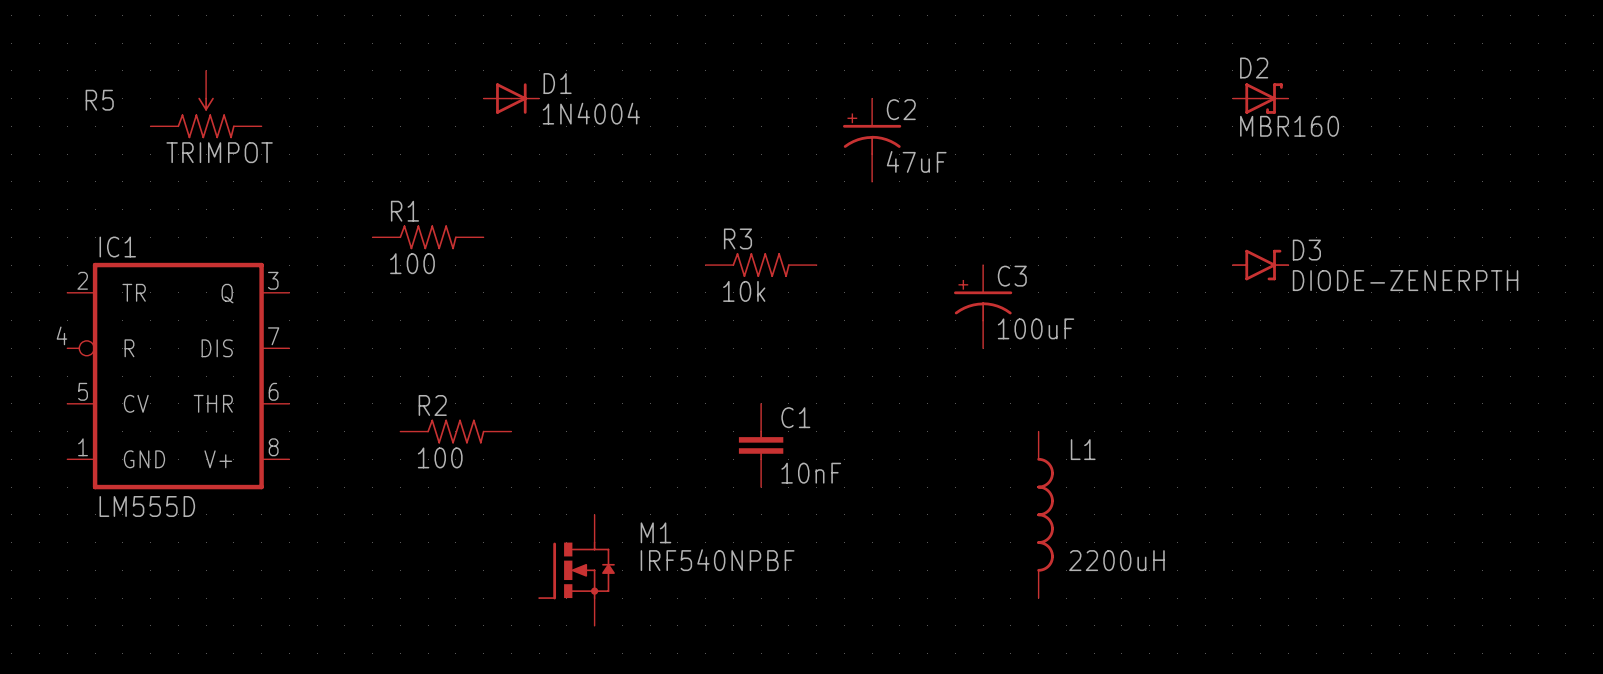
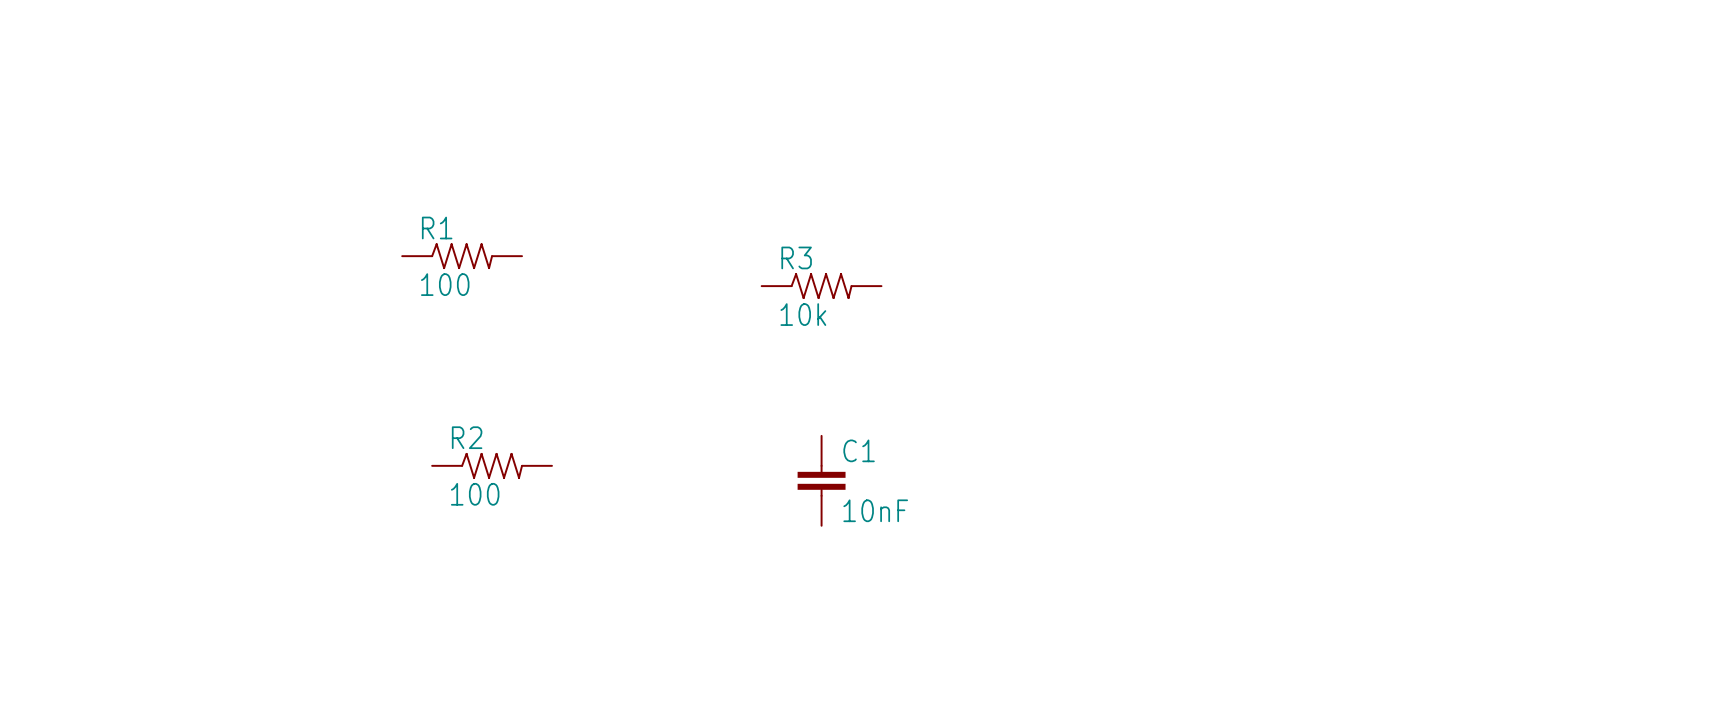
D1: 1N4004 (511, 98) -> none
D2: MBR160 (1260, 98) -> none
R5: TRIMPOT (206, 104) -> none
C2: 47uF (872, 140) -> none
D3: DIODE-ZENERPTH (1260, 265) -> none
C3: 100uF (983, 306) -> none
IC1: LM555D (178, 376) -> none
L1: 2200uH (1045, 514) -> none
M1: IRF540NPBF (576, 570) -> none

